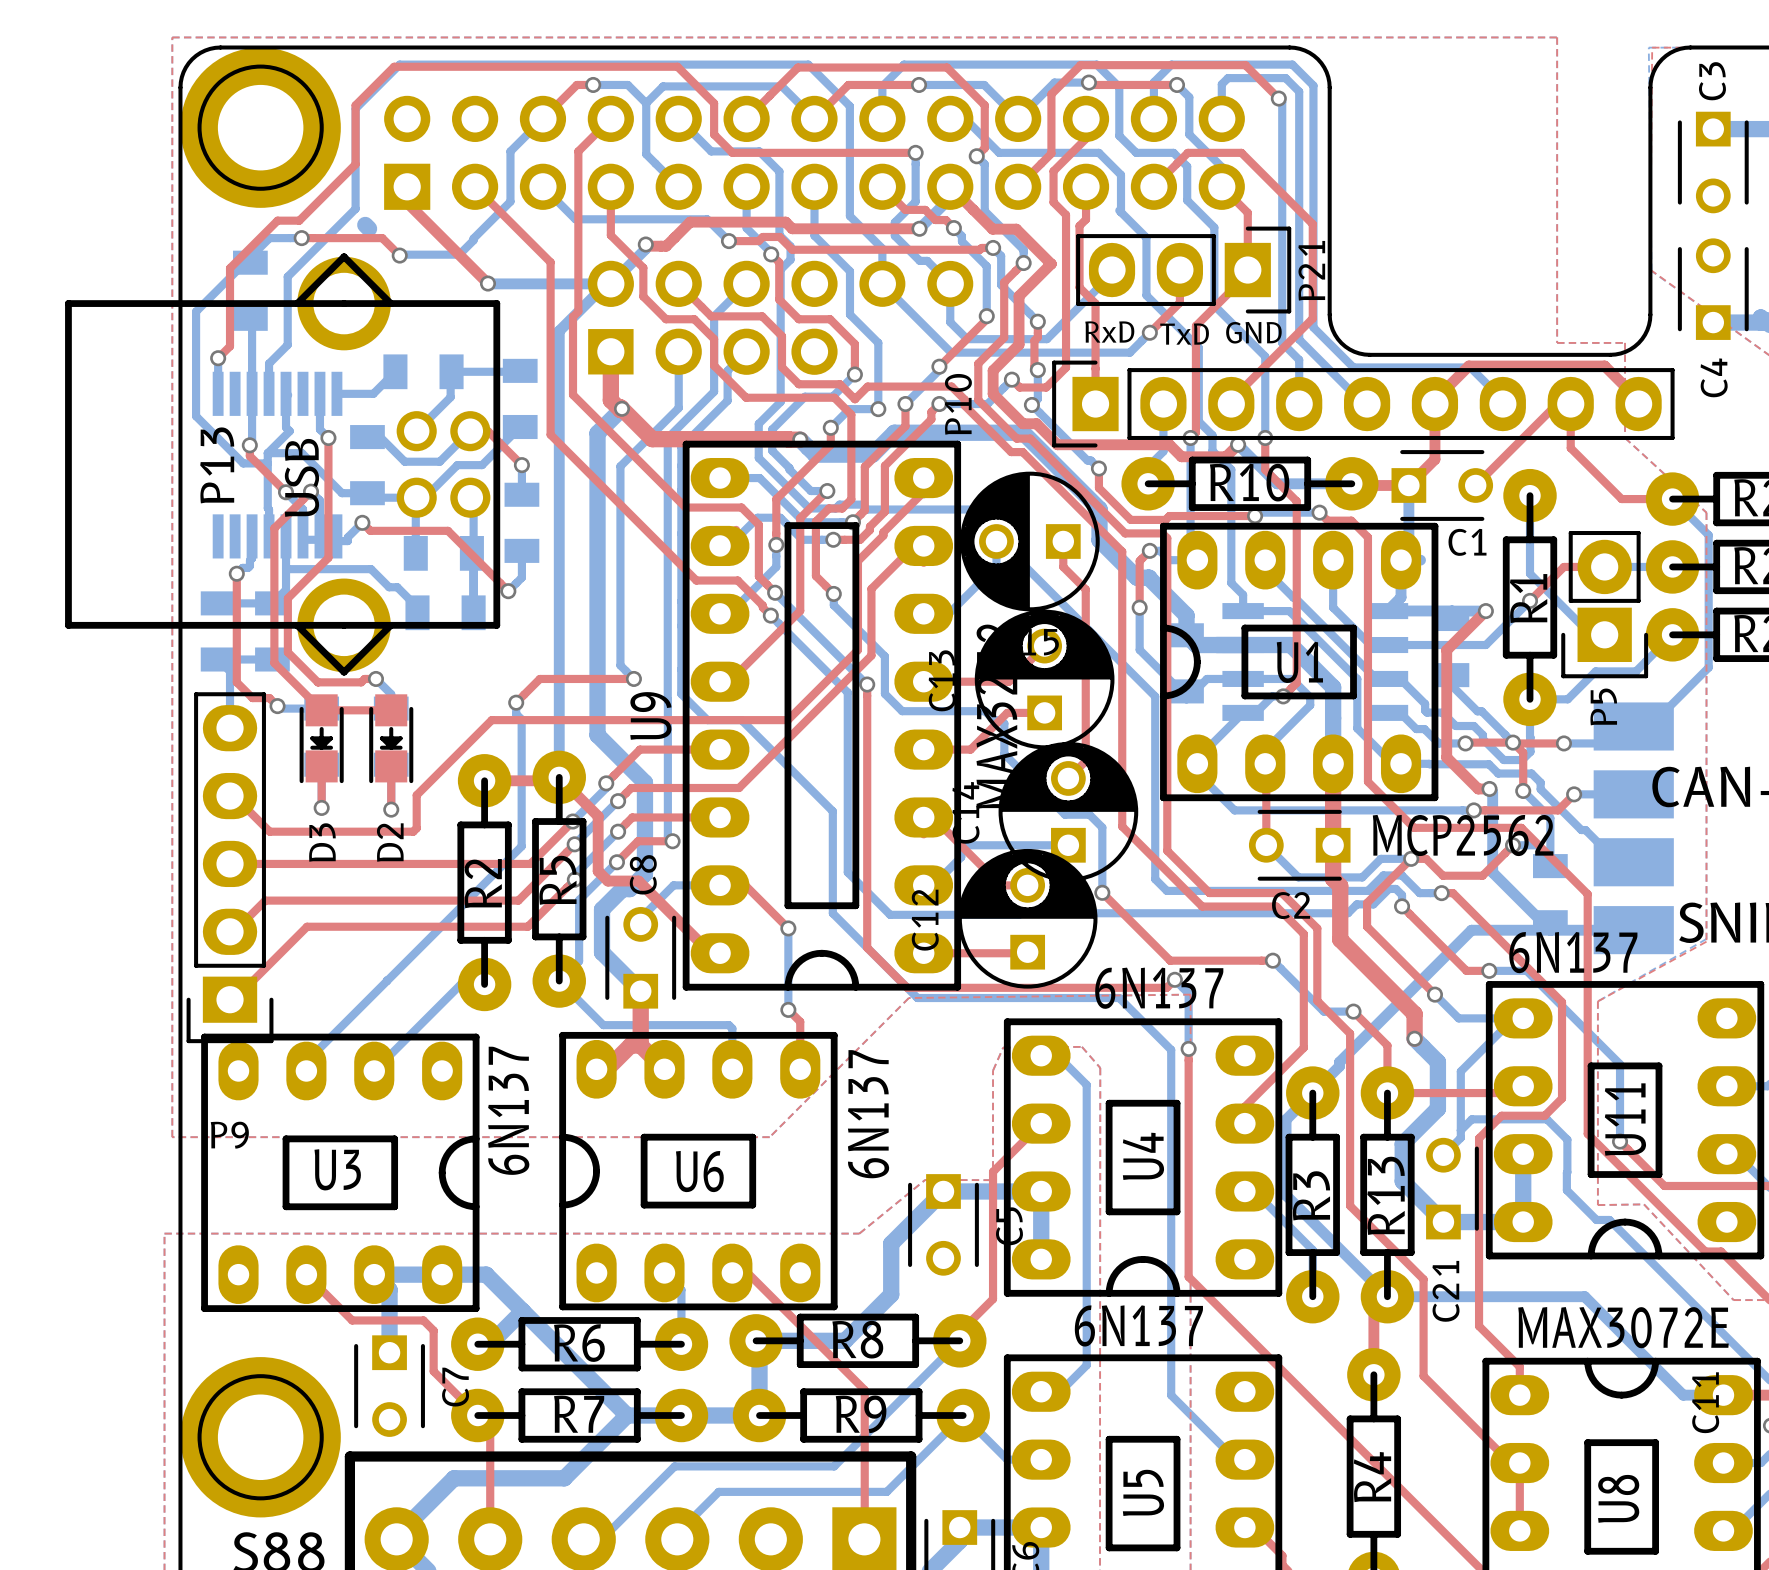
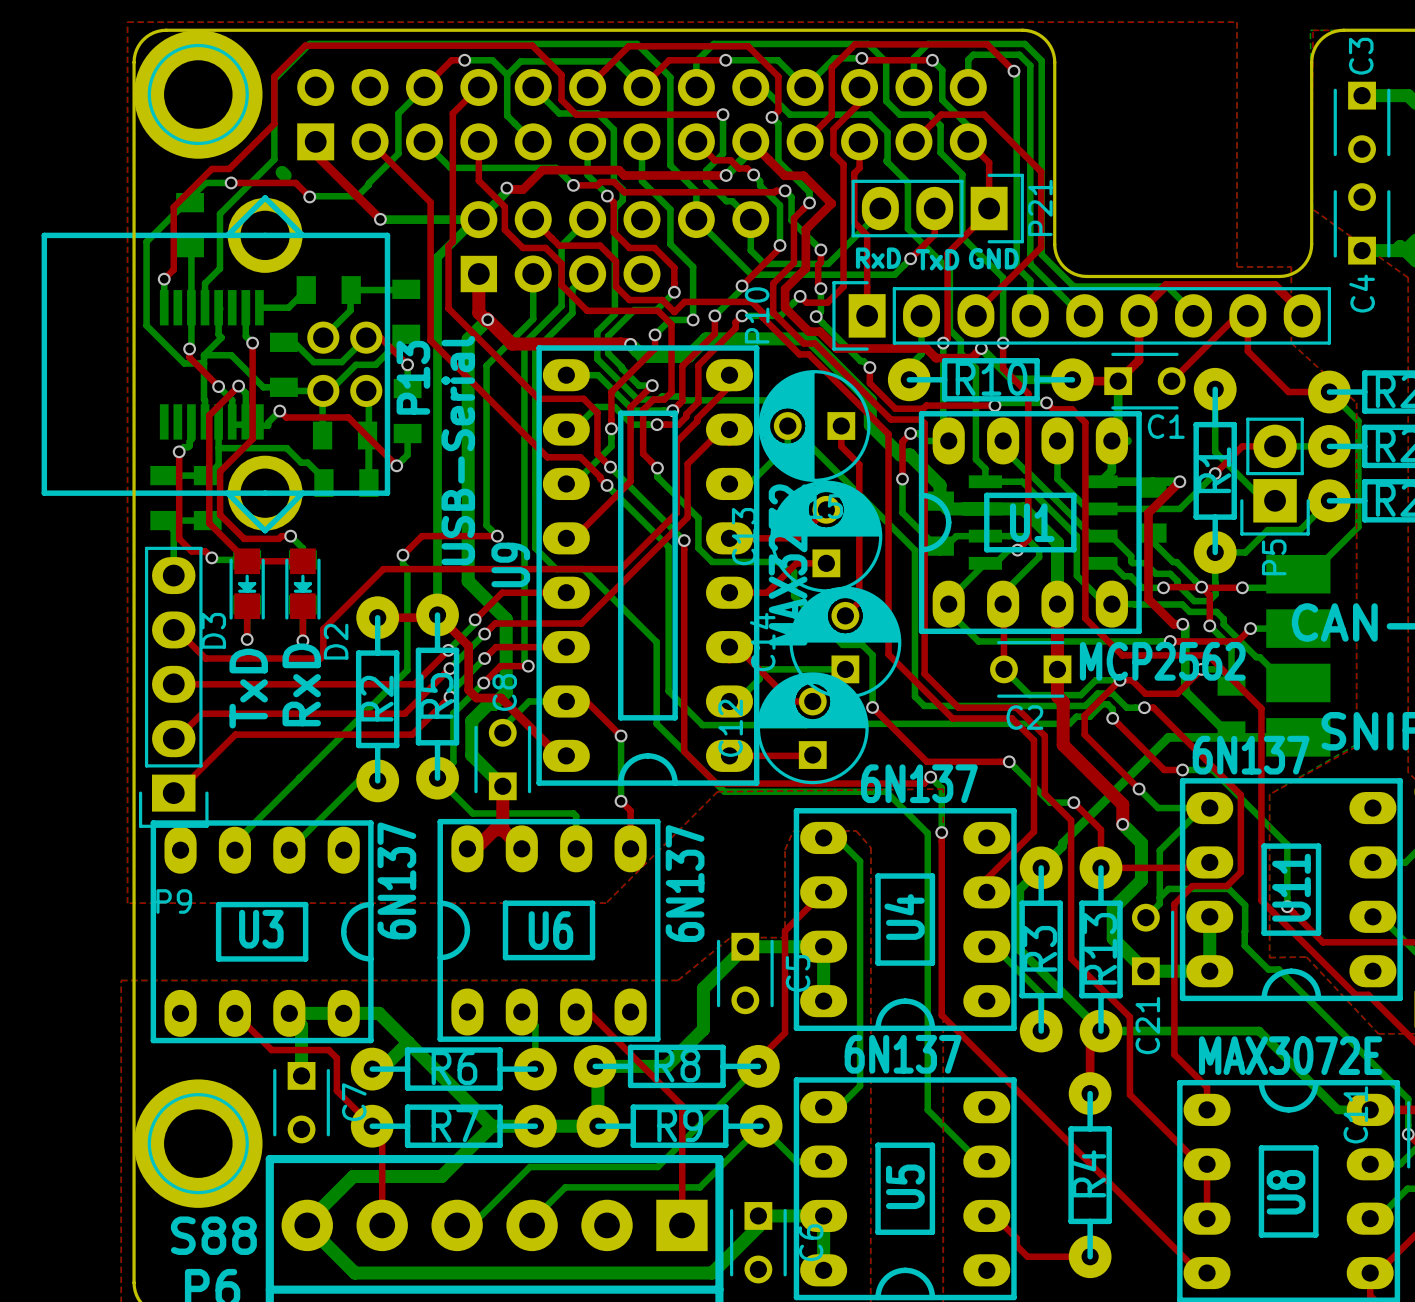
P13 name position: P13 (217, 465) -> P13 (413, 377)
P13 value: USB (301, 477) -> USB-Serial (458, 450)
D3 name position: D3 (322, 842) -> D3 (213, 630)
D2 name position: D2 (390, 842) -> D2 (336, 641)
text: none -> RxD (301, 684)
text: none -> TxD (248, 688)

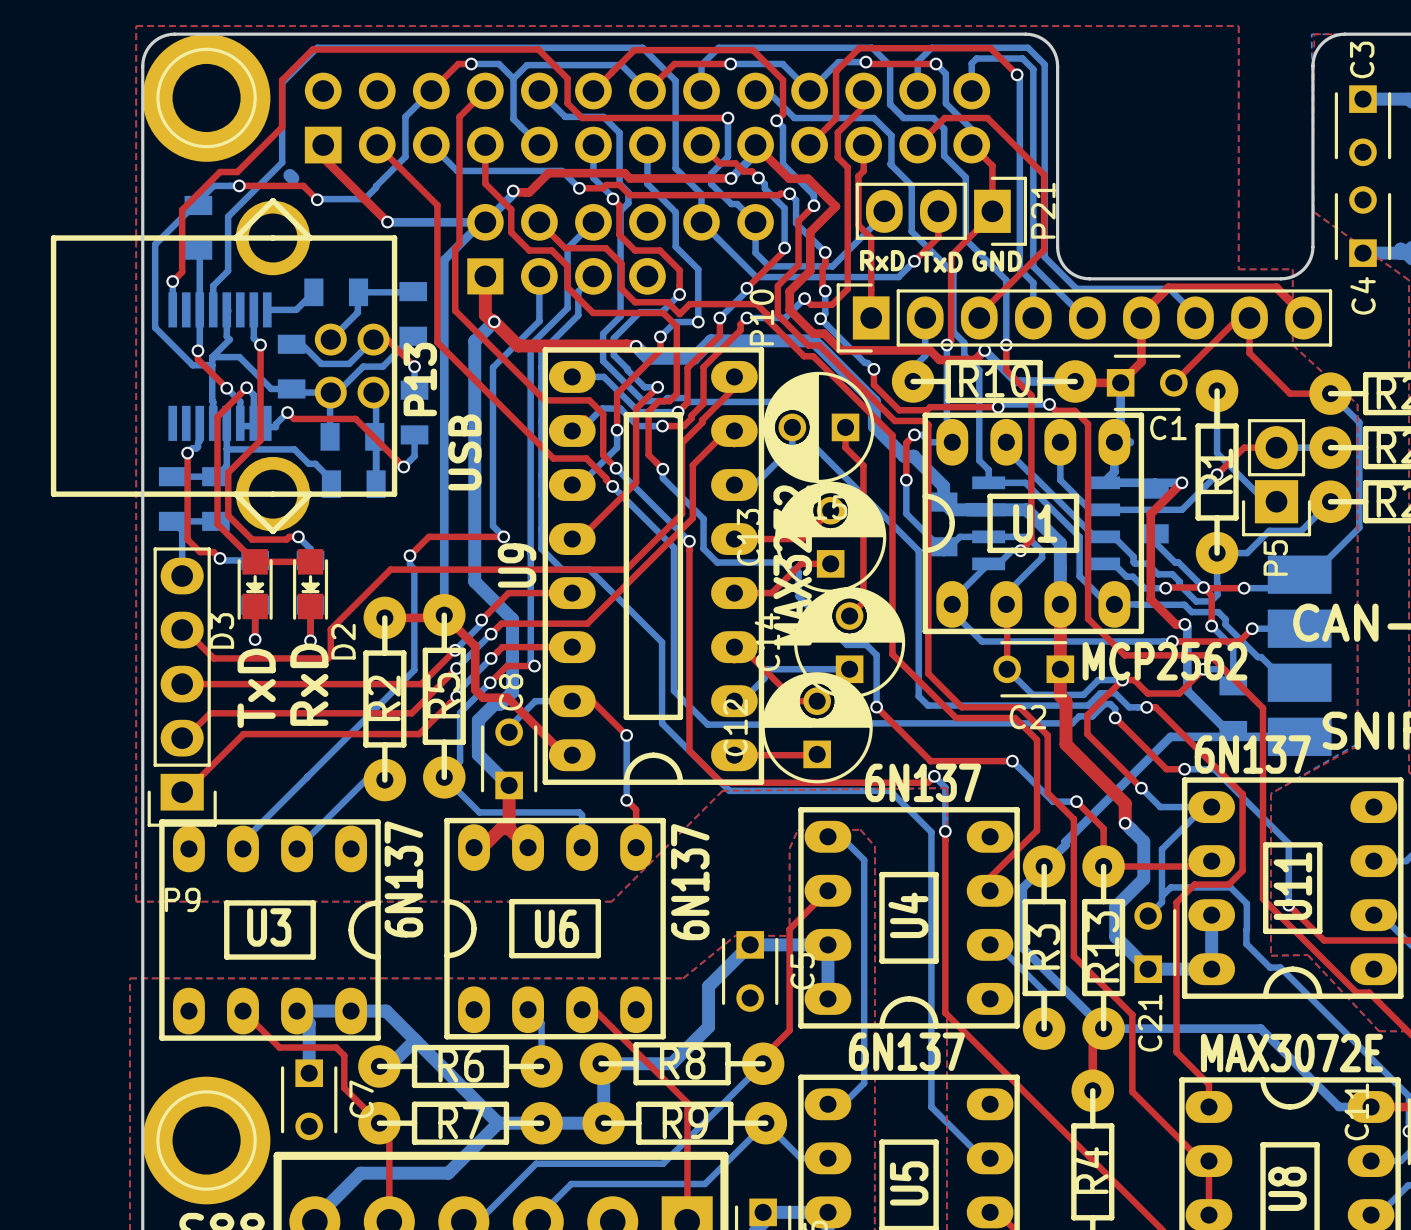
P13 value: USB-Serial (458, 450) -> USB (464, 452)

